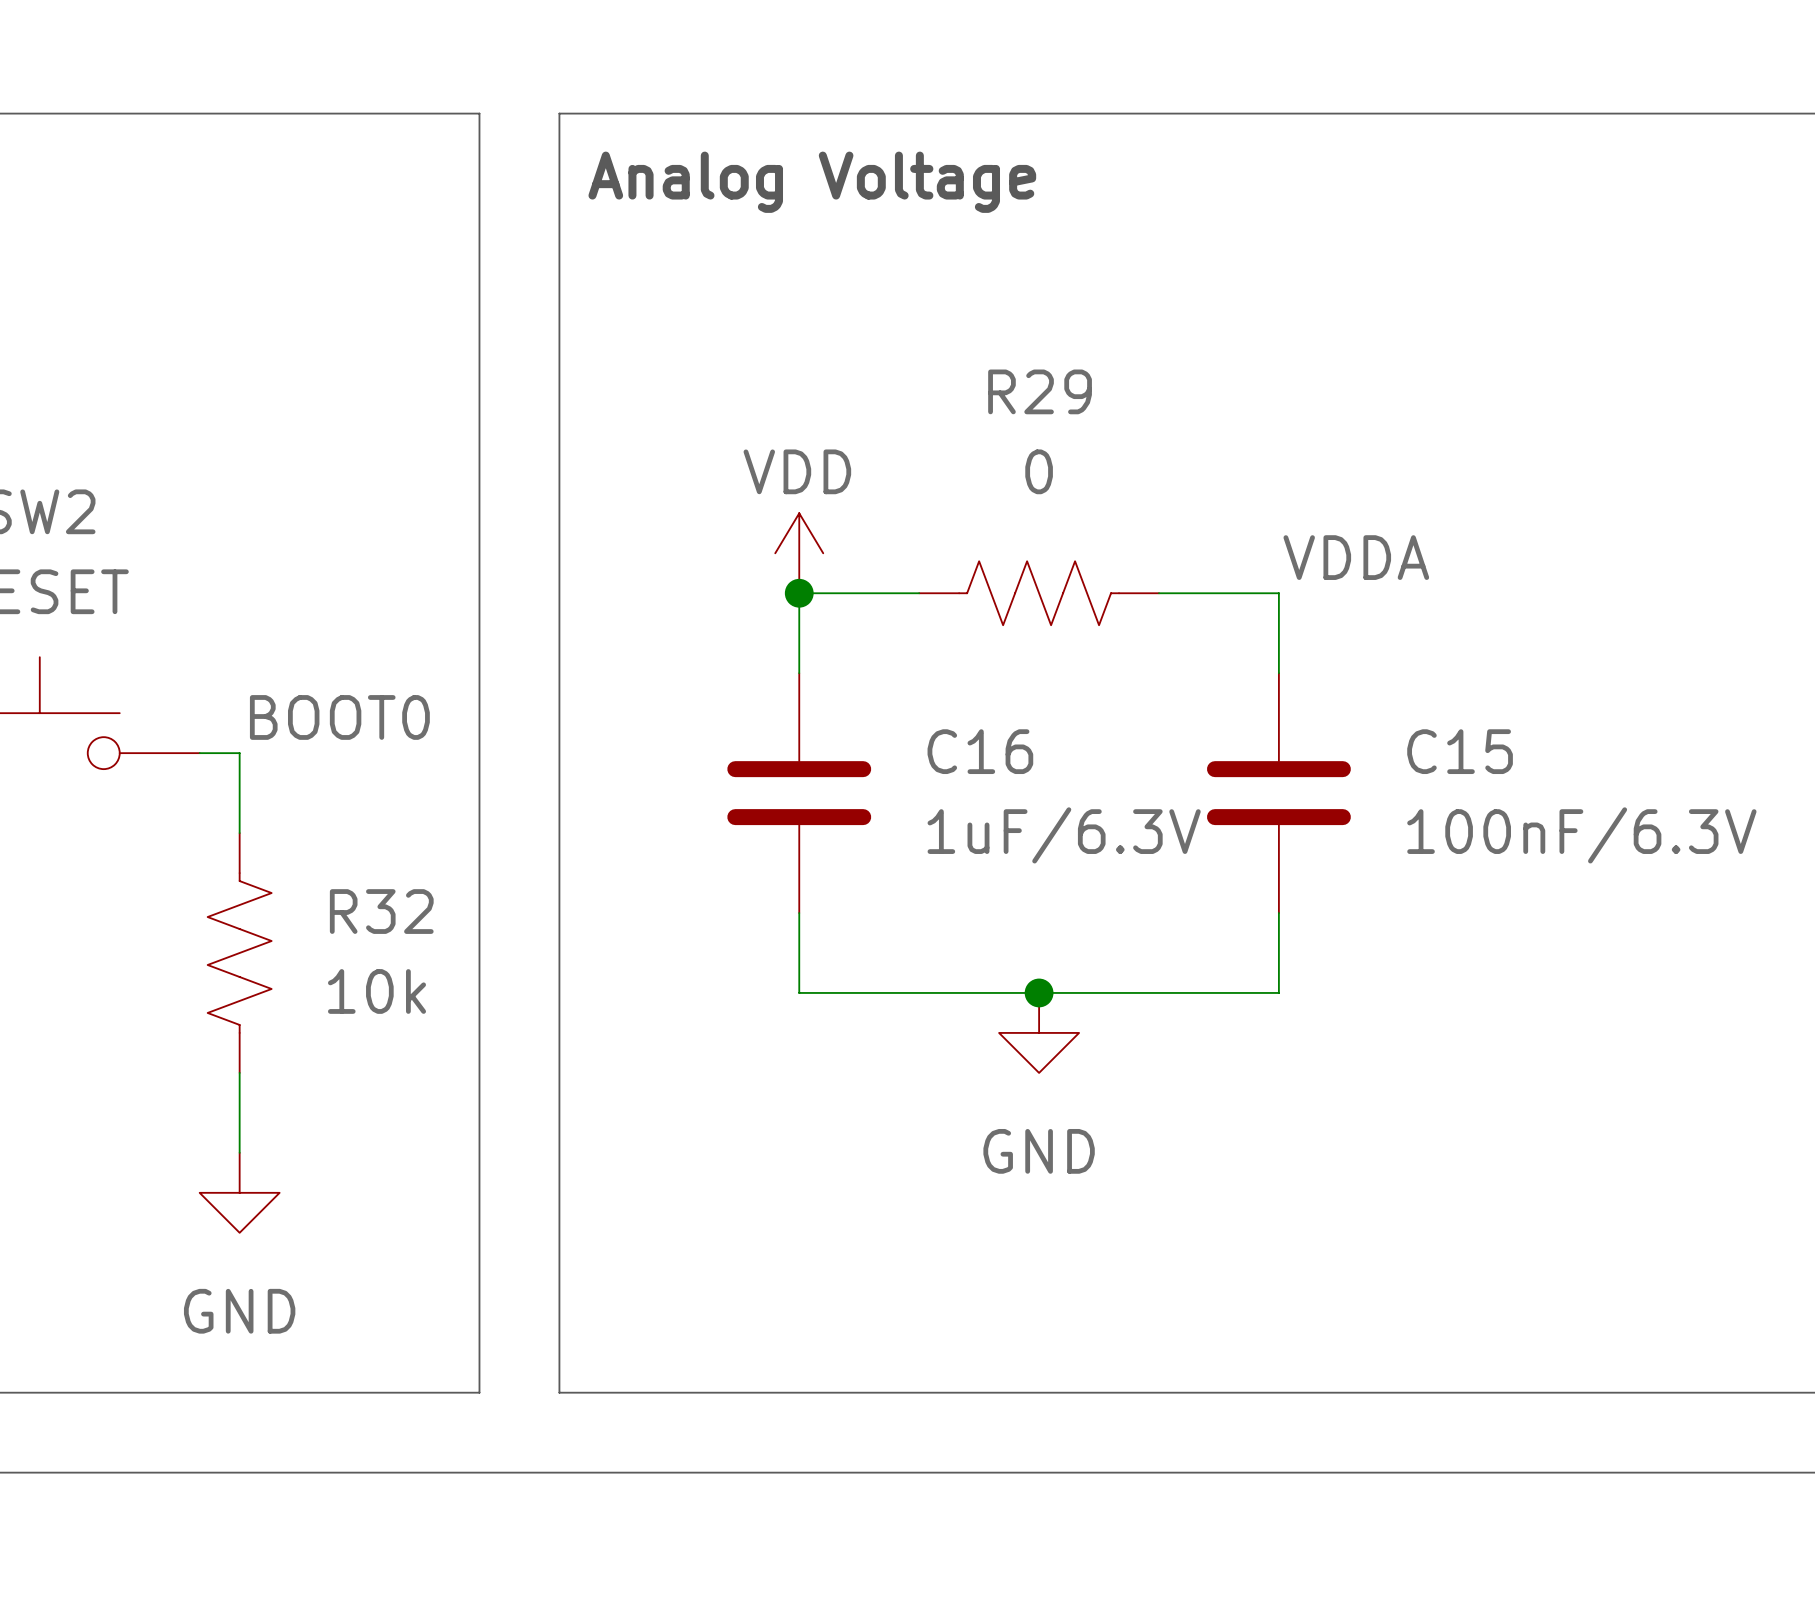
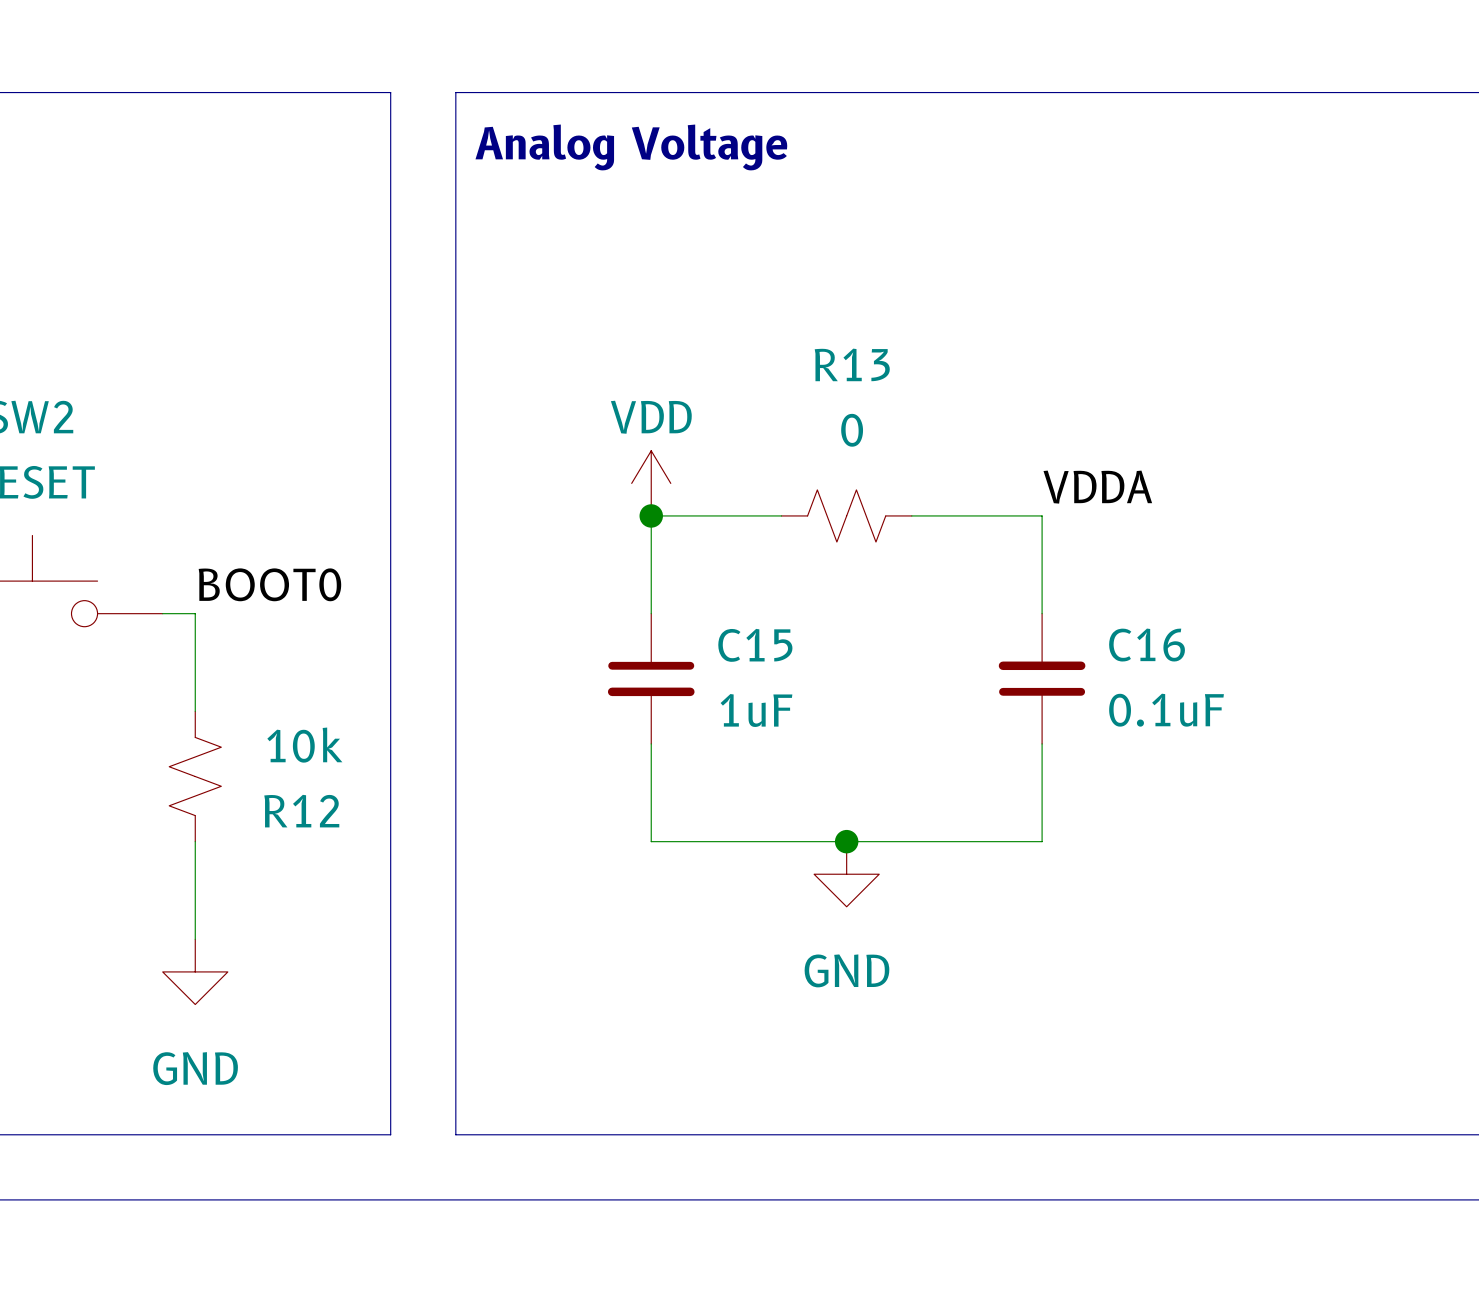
power symbol position: VDD (799, 553) -> VDD (651, 483)
label position: VDDA (1356, 557) -> VDDA (1097, 487)
junction position: (799, 593) -> (651, 515)
wire: (919, 593) (799, 593) (799, 633) -> (781, 515) (651, 515)
R29: 0 (1039, 593) -> none
wire: (1159, 593) (1278, 593) (1278, 633) -> (911, 515) (1042, 515)
R13: none -> 0 (846, 515)
C16 symbol: [727, 673, 872, 914] -> [998, 613, 1086, 744]
C15 symbol: [1206, 673, 1351, 914] -> [607, 613, 695, 744]
C16 value: 1uF/6.3V (1064, 835) -> 0.1uF (1166, 710)
C15 value: 100nF/6.3V (1581, 835) -> 1uF (756, 710)
R32: 10k (239, 953) -> none
R12: none -> 10k (195, 776)
wire: (799, 992) (1278, 992) -> (651, 809) (651, 841) (1042, 841) (1042, 809)
junction position: (1039, 992) -> (846, 841)
power symbol position: GND (1039, 1032) -> GND (846, 874)

